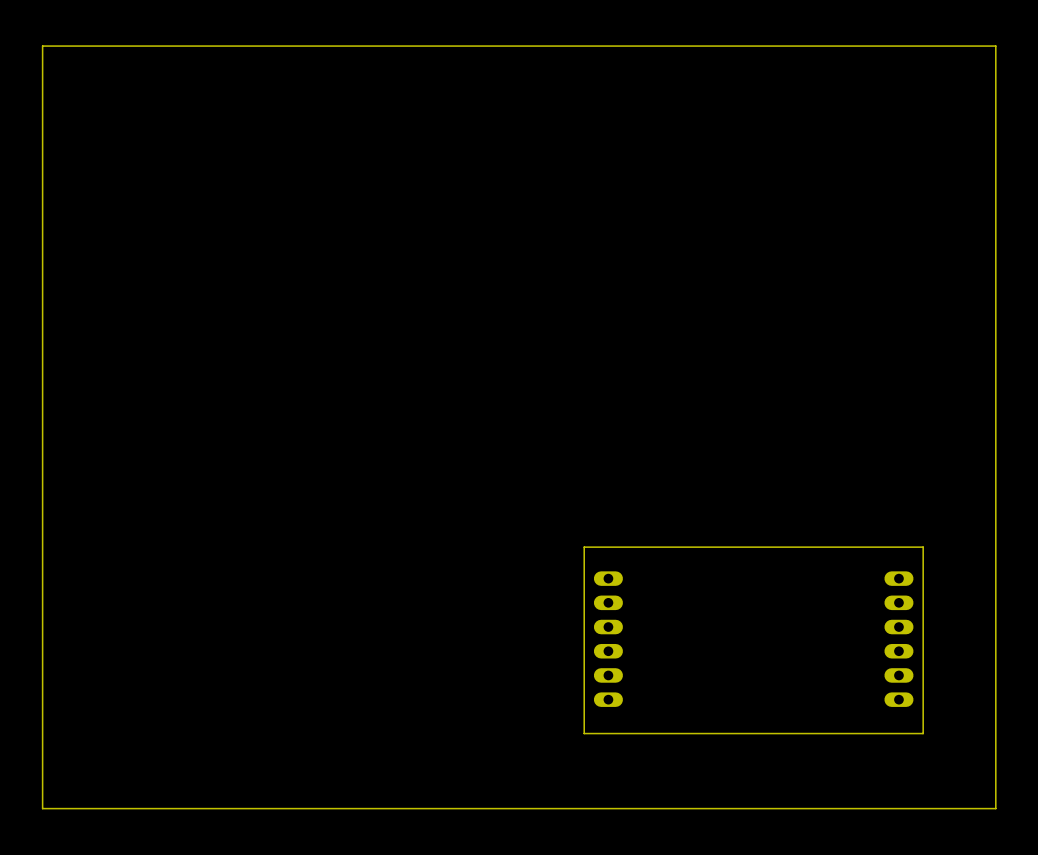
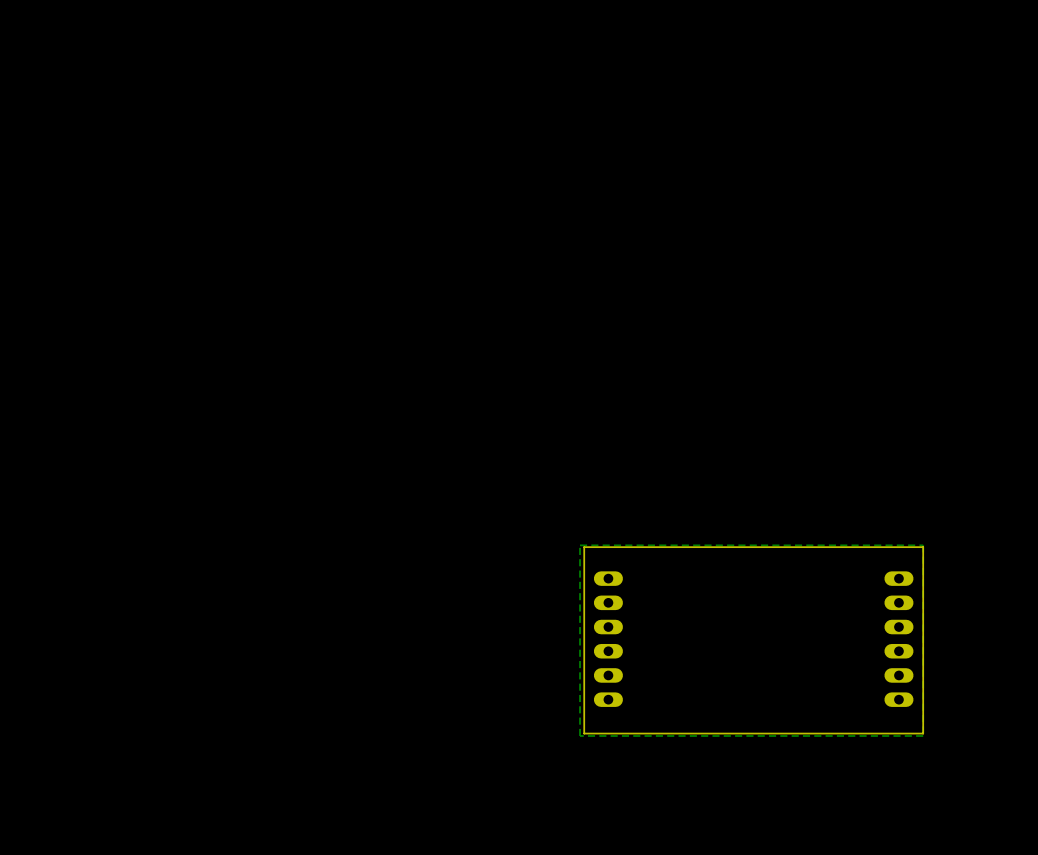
board edge: (995, 46) (42, 46) (42, 808) (995, 808) (995, 46) -> none
zone outline: none -> (923, 545) (923, 735) (580, 735) (580, 545) (923, 545)

